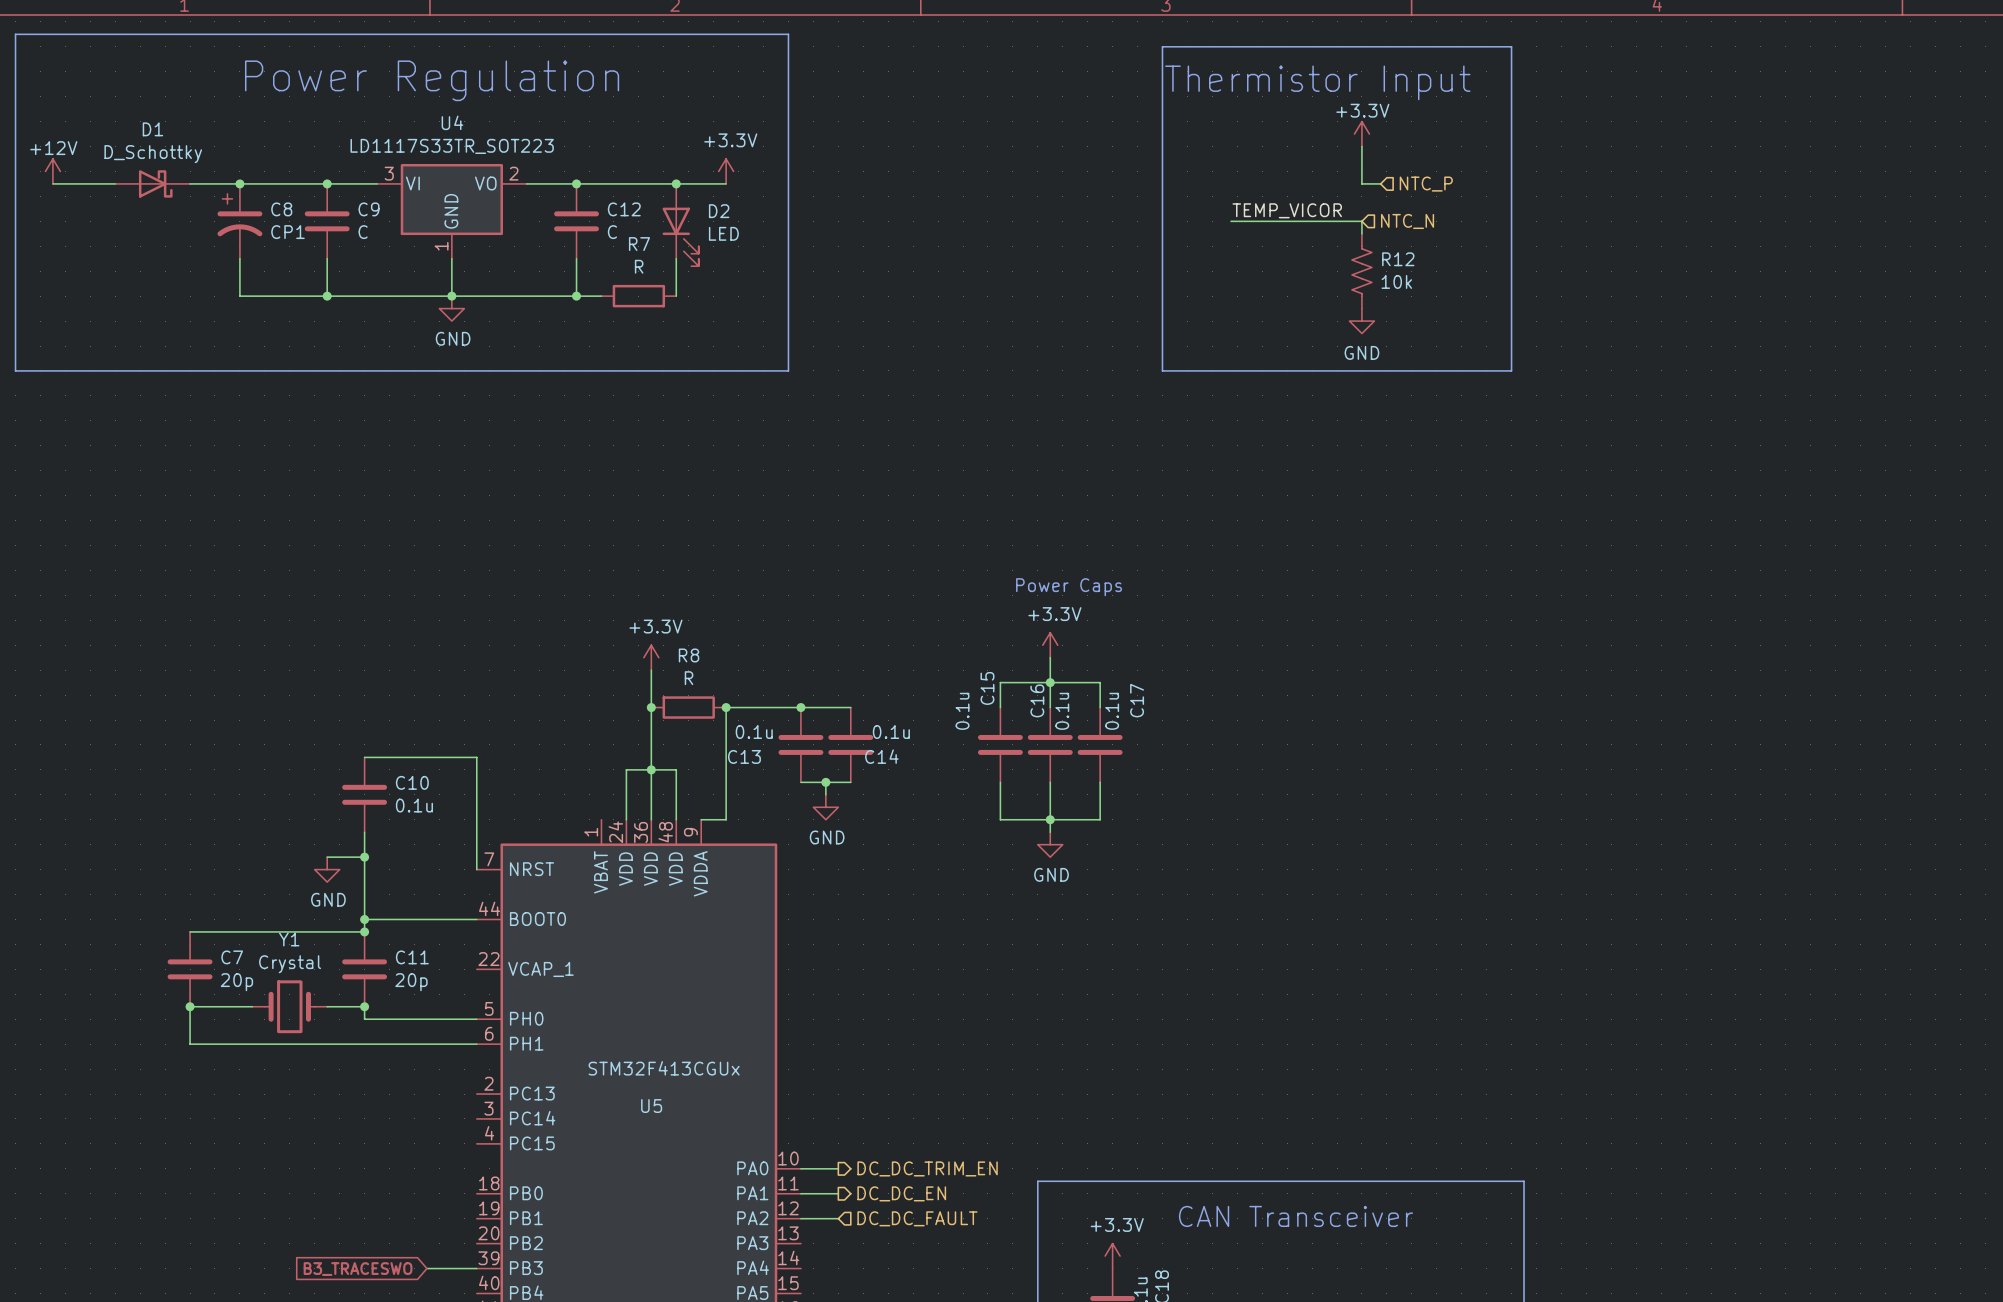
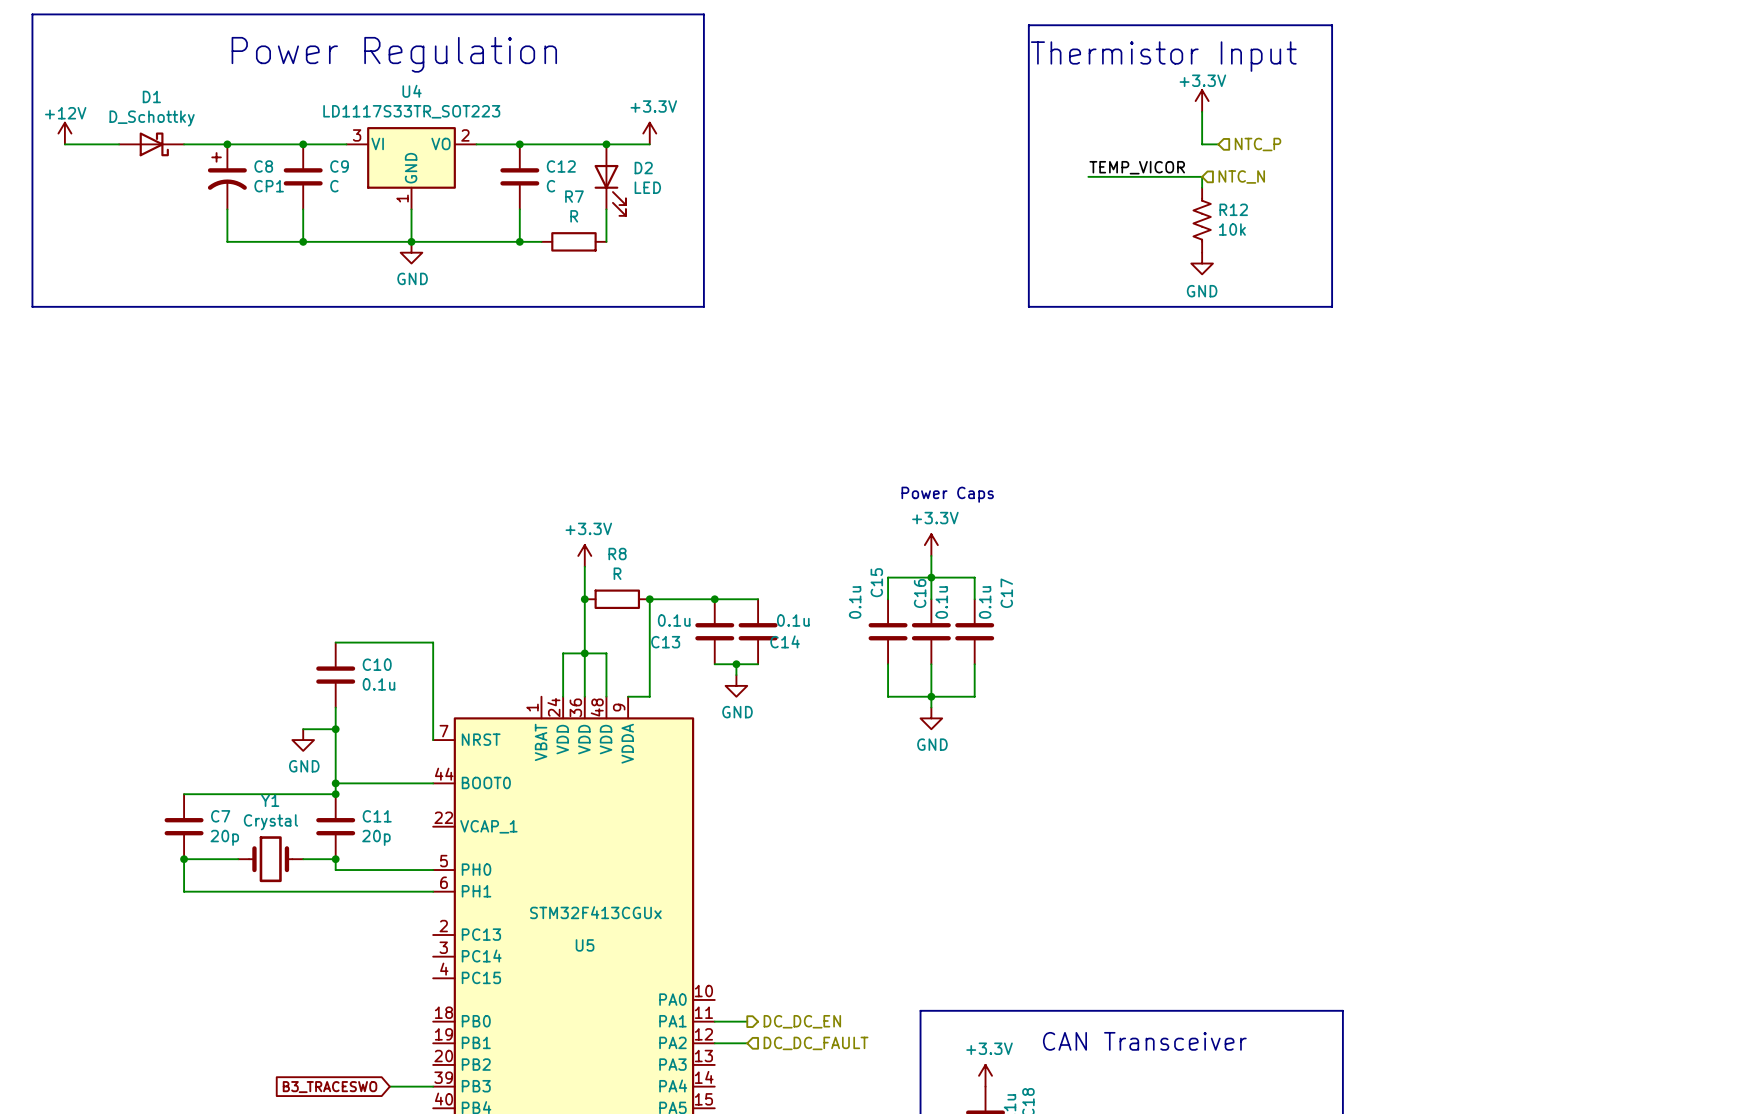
wire: (800, 1168) (838, 1168) -> none
hierarchical label: DC_DC_TRIM_EN (927, 1168) -> none

